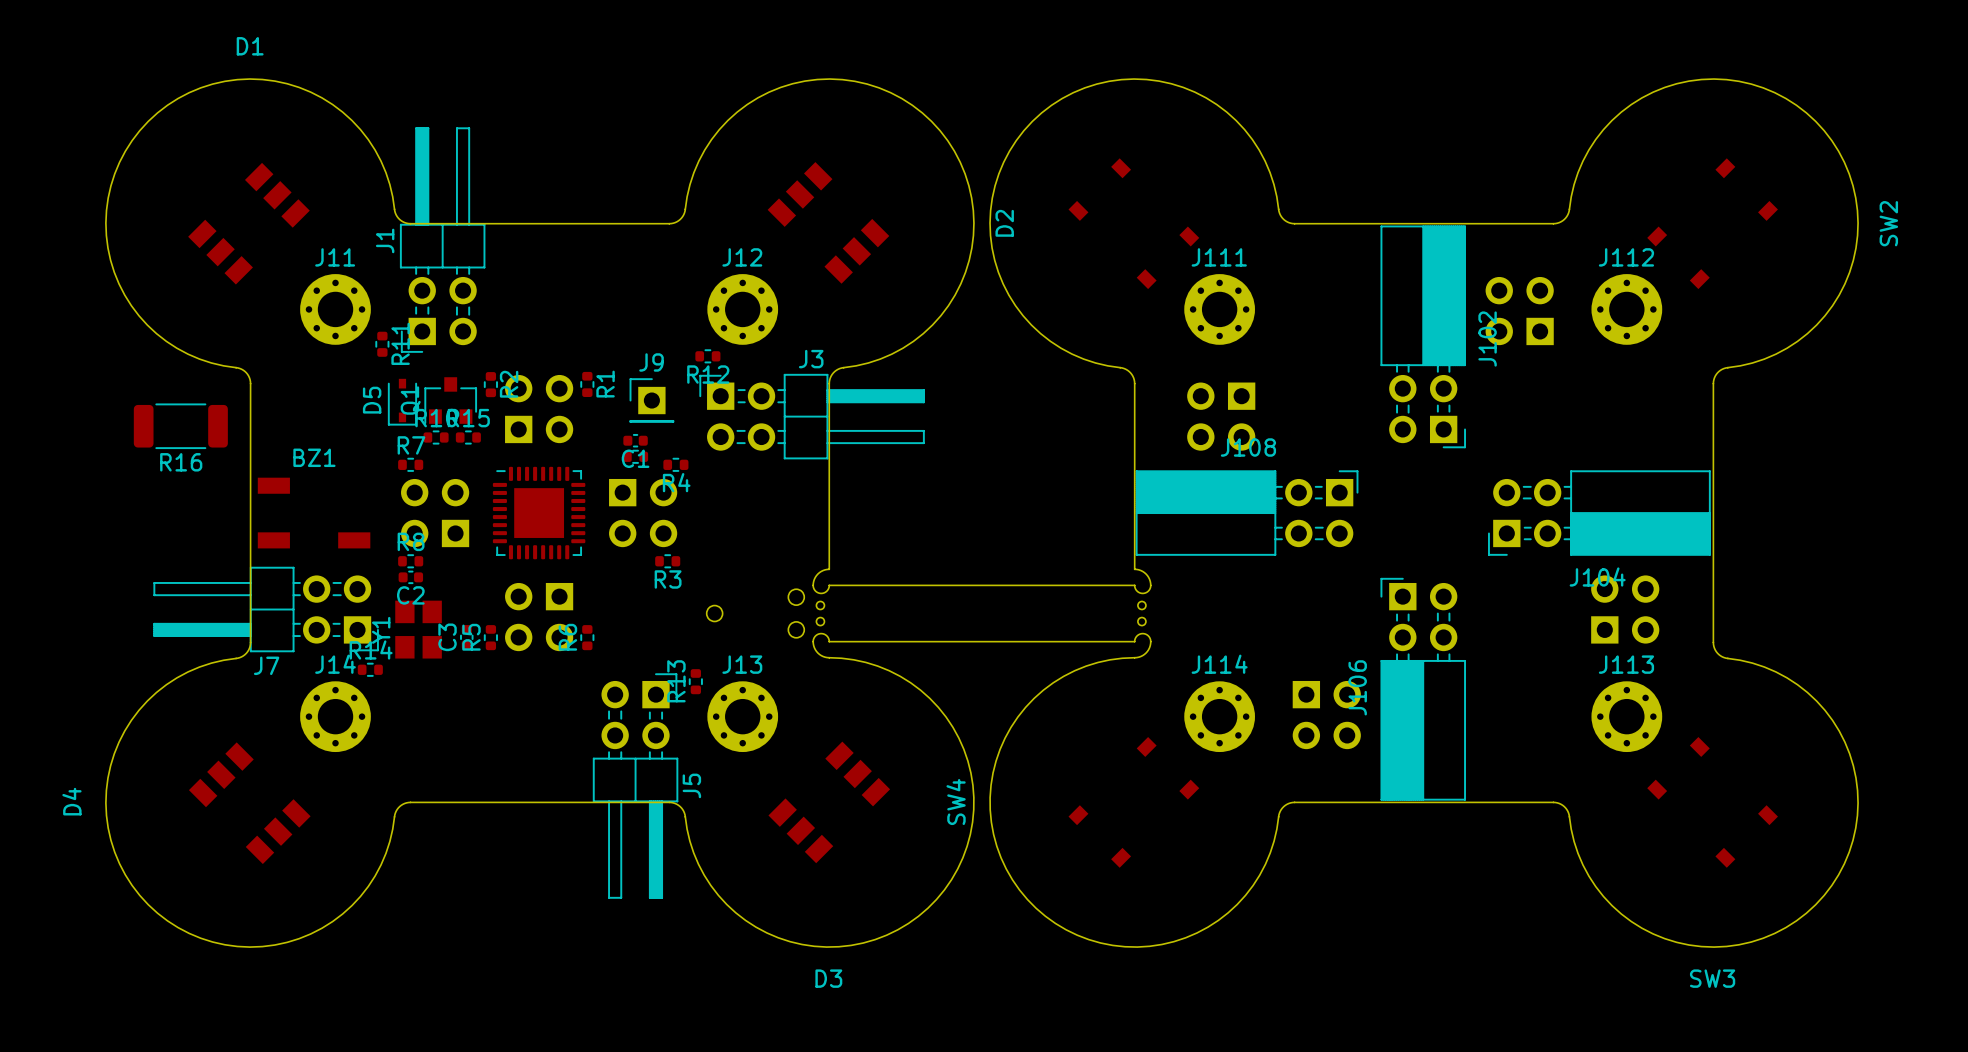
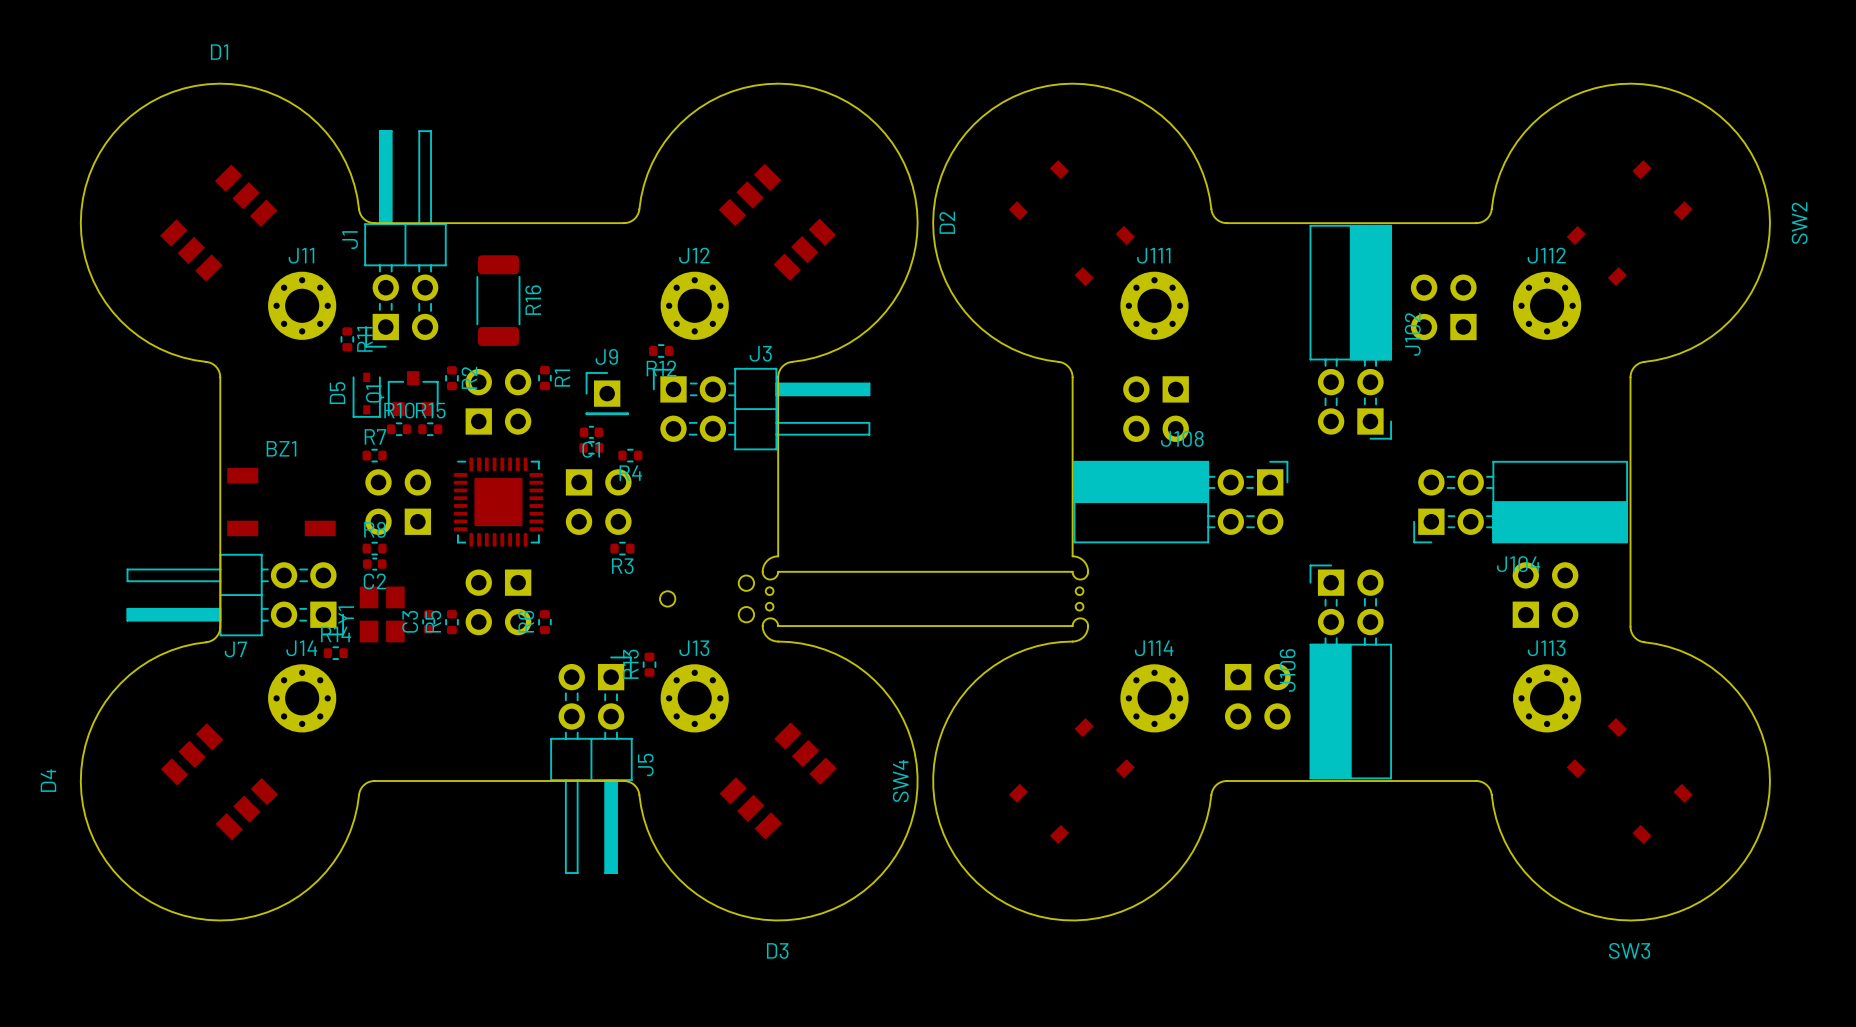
R16 rotation: 0° (180, 426) -> 90° clockwise (498, 300)
R16 position: (180, 426) -> (498, 300)
R16 name position: R16 (181, 462) -> R16 (533, 300)

